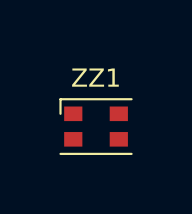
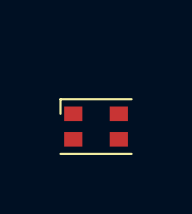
ZZ1 name: ZZ1 (95, 77) -> none

